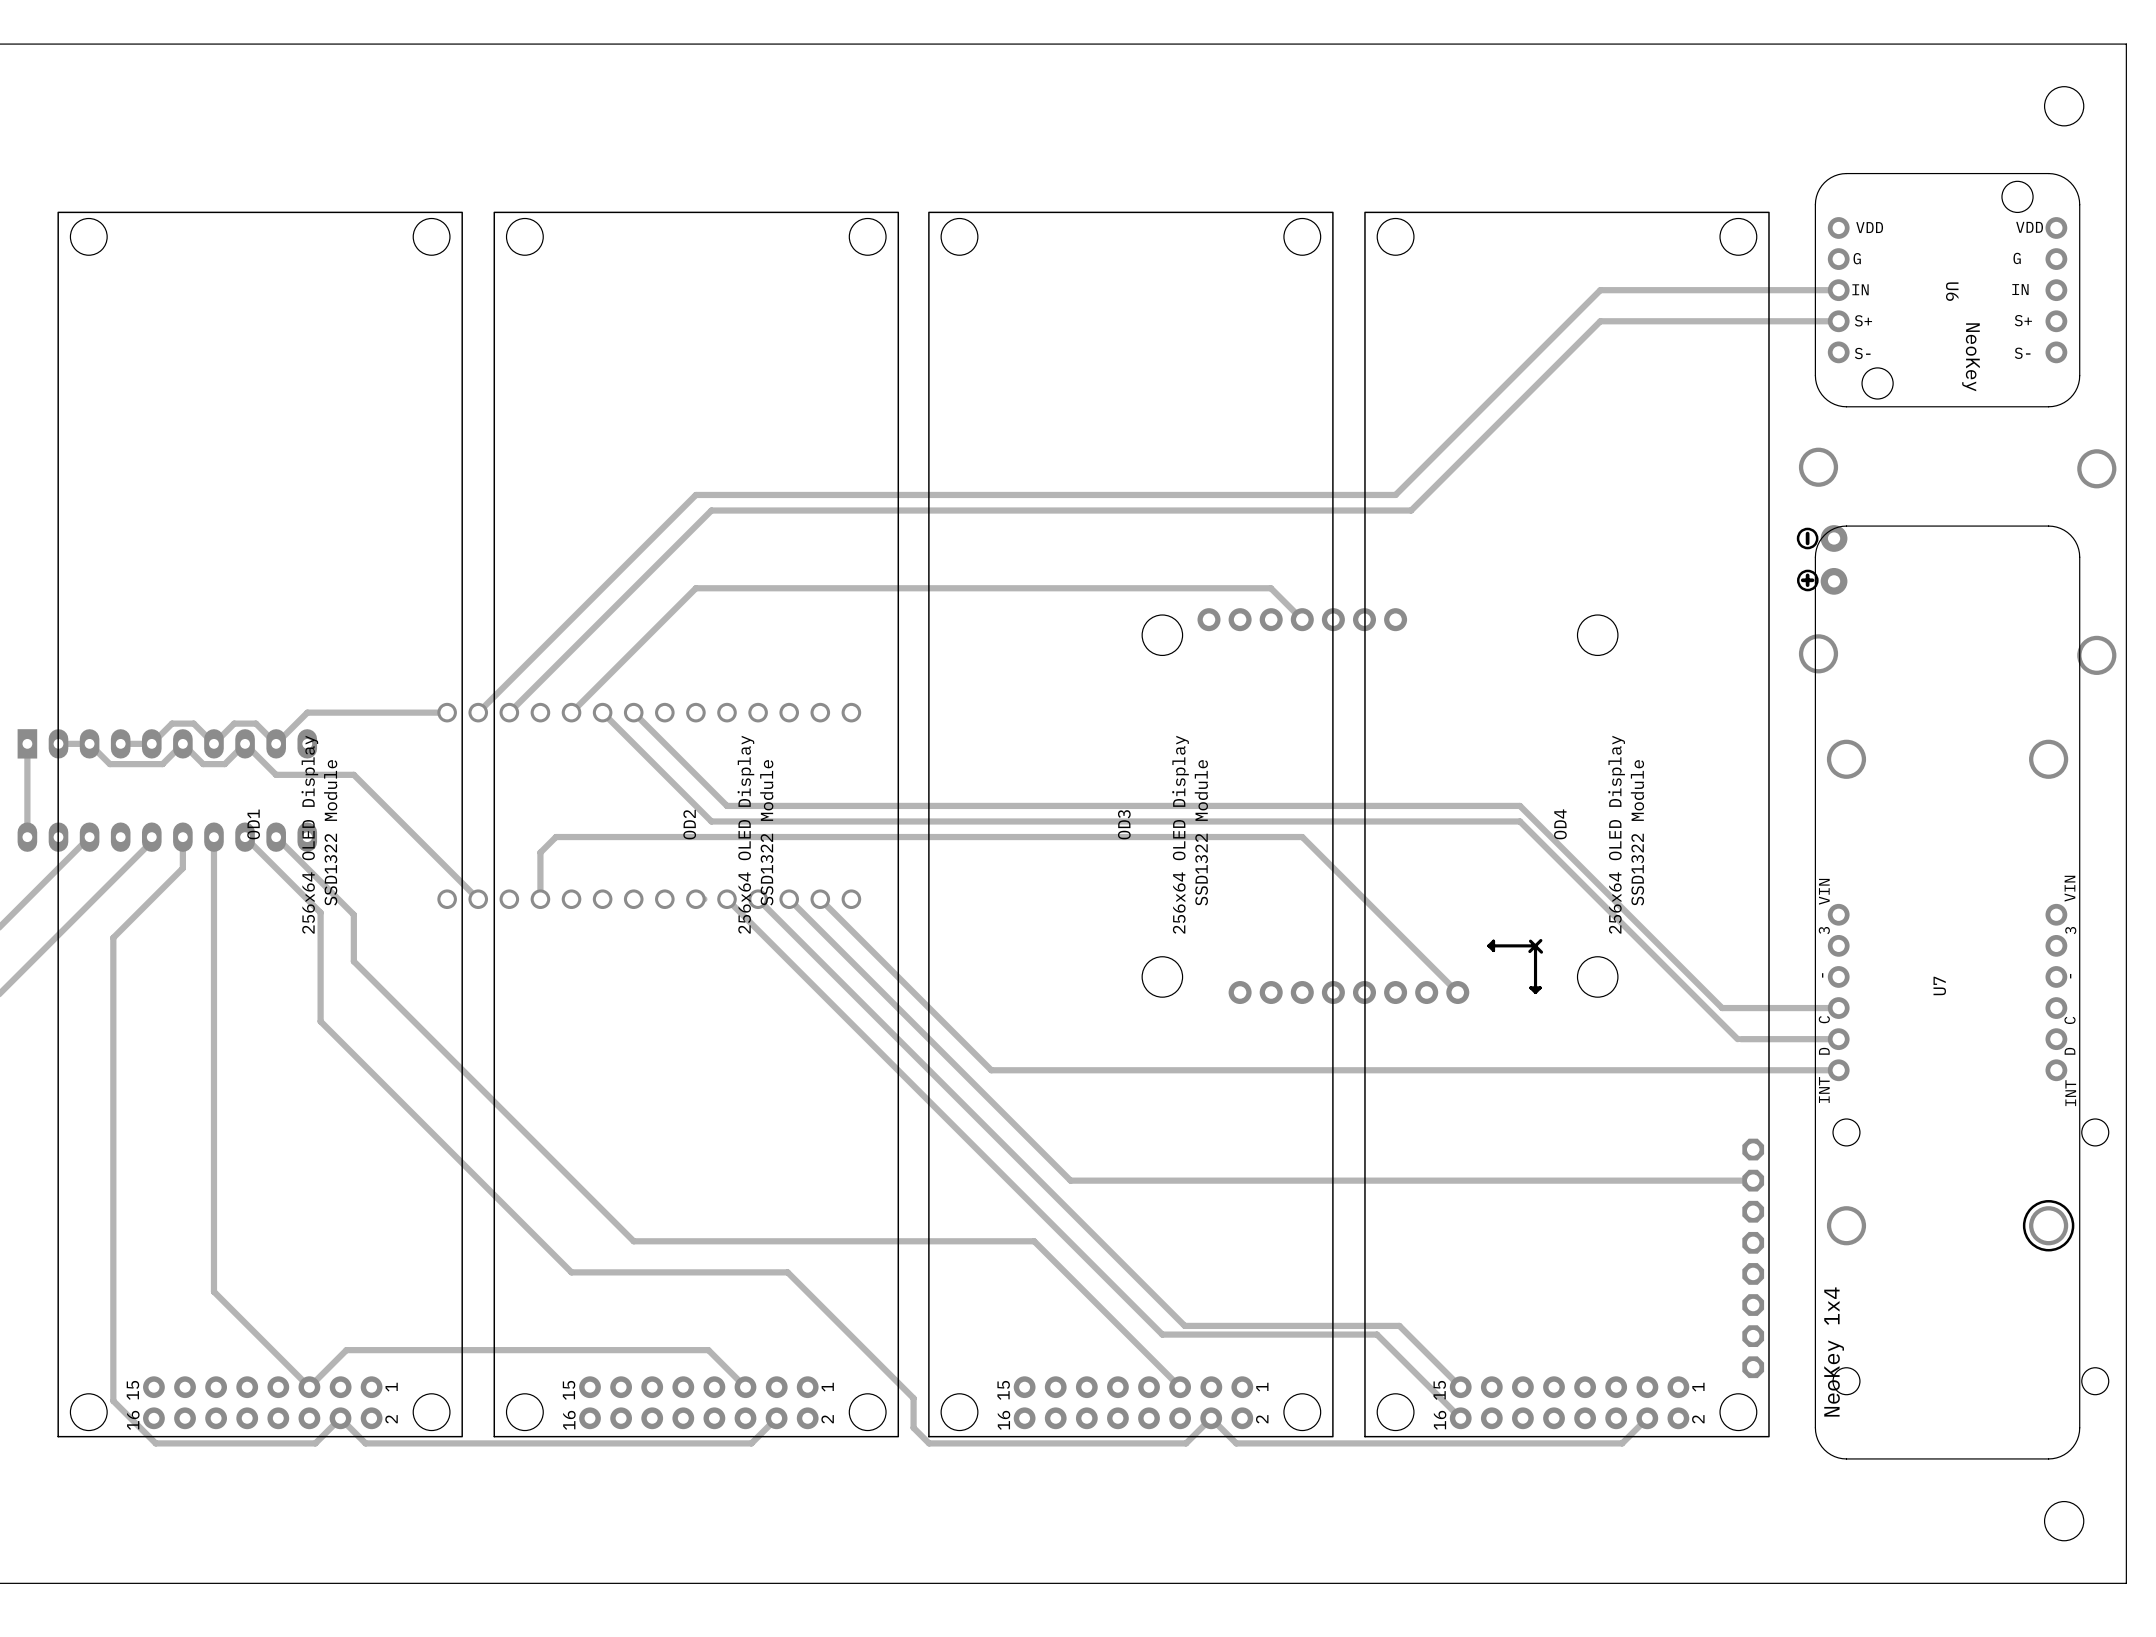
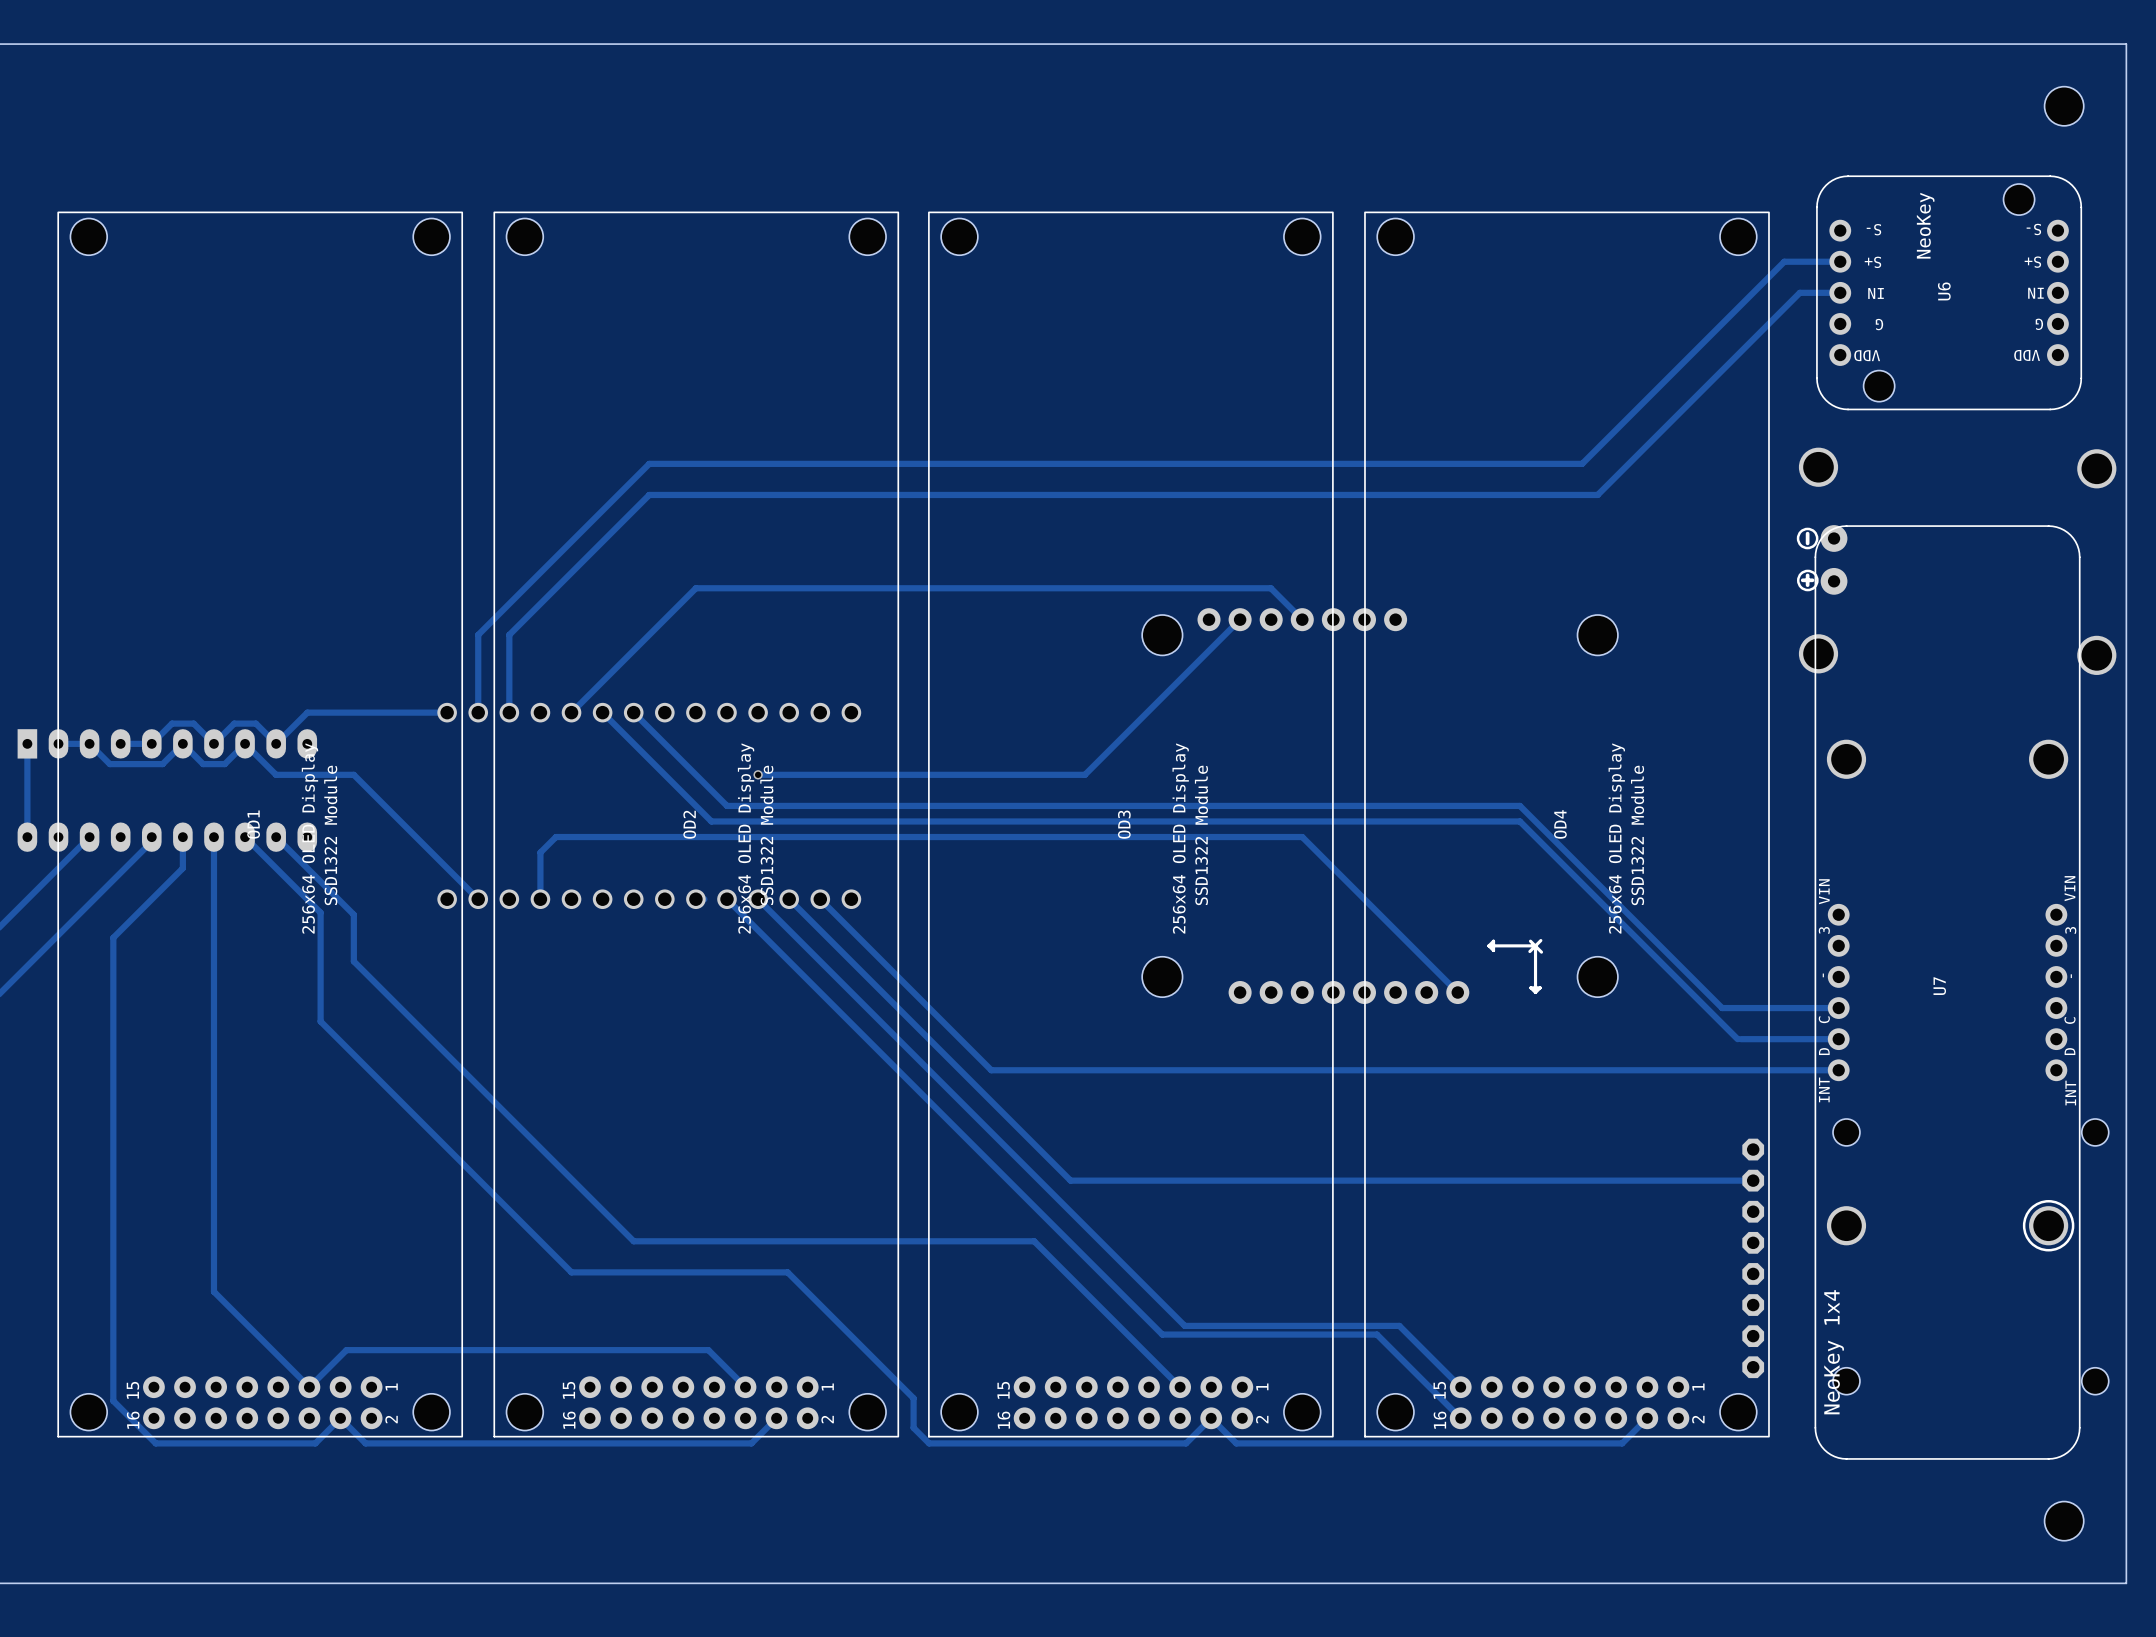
track: none -> (1840, 261) (1784, 261) (1582, 463) (649, 463) (478, 634) (478, 712)
track: (1838, 290) (1600, 290) (1395, 494) -> (1840, 292) (1799, 292) (1597, 494) (1395, 494)
U6 rotation: 0° (1947, 290) -> 180° (1949, 292)
track: (1838, 321) (1600, 321) (1411, 510) (711, 510) (509, 712) -> none
track: (695, 494) (478, 712) -> (695, 494) (649, 494) (509, 634) (509, 712)
track: none -> (1240, 619) (1084, 774) (758, 774)
via: none -> (758, 774)

